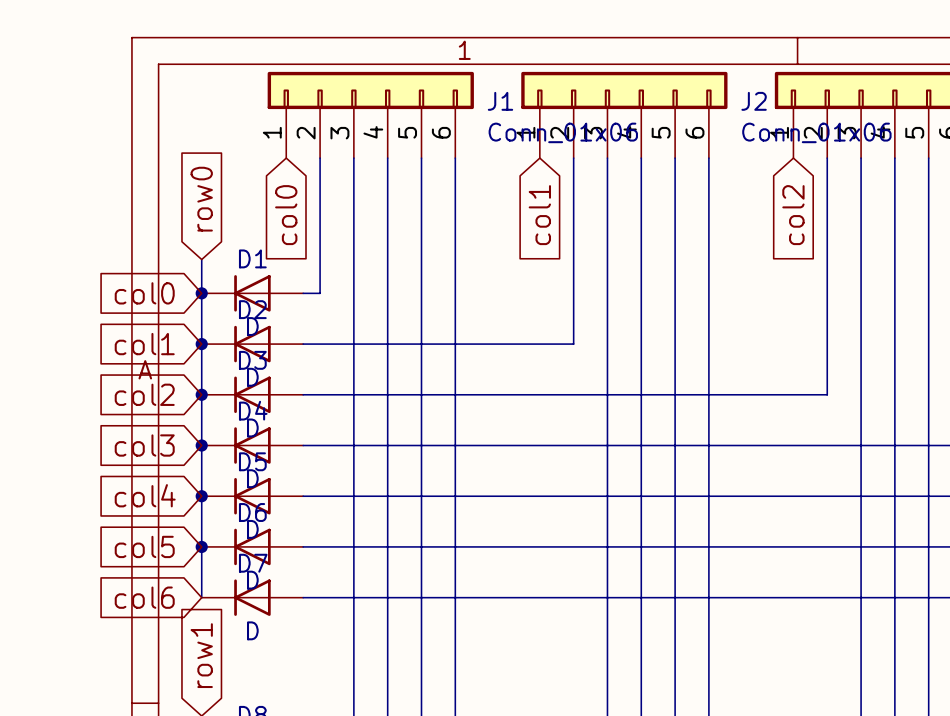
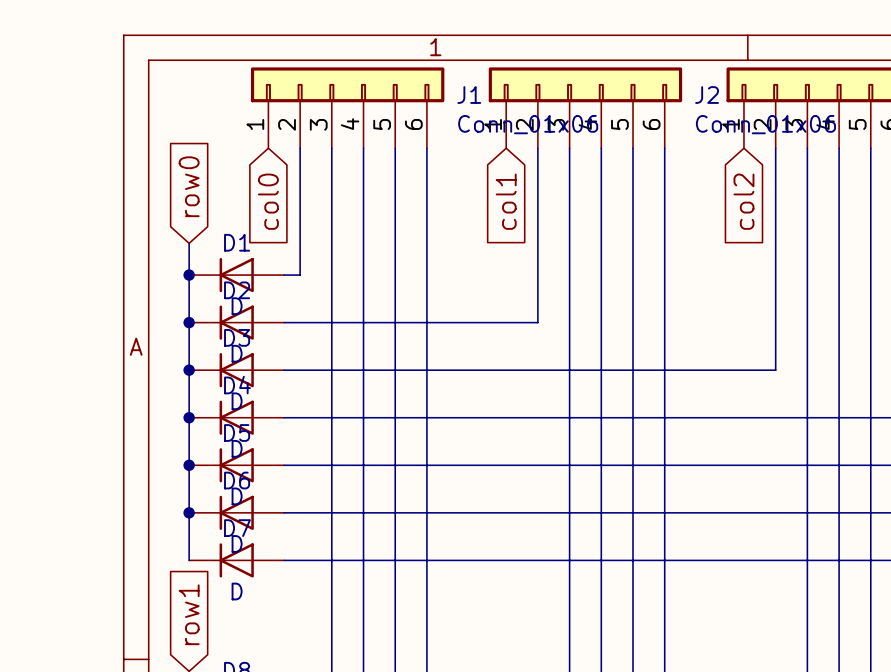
global label: col0 (144, 293) -> none
global label: col1 (144, 344) -> none
global label: col2 (144, 394) -> none
global label: col3 (144, 445) -> none
global label: col4 (145, 495) -> none
global label: col5 (144, 546) -> none
global label: col6 (144, 597) -> none

